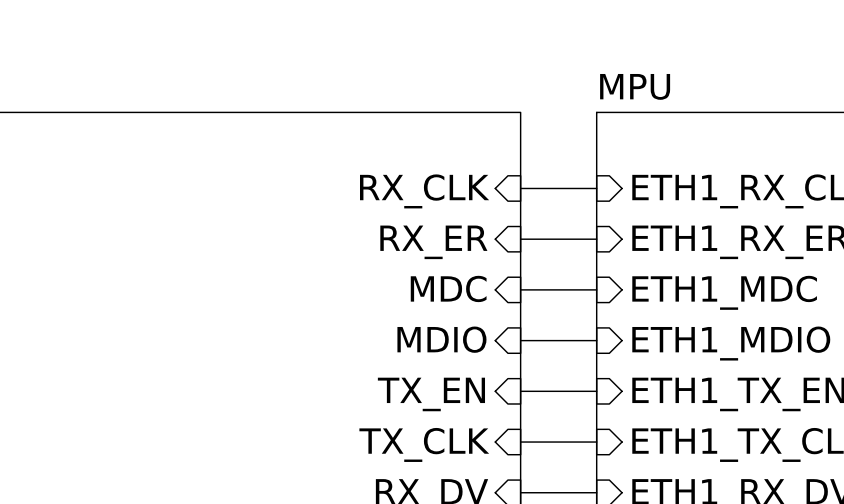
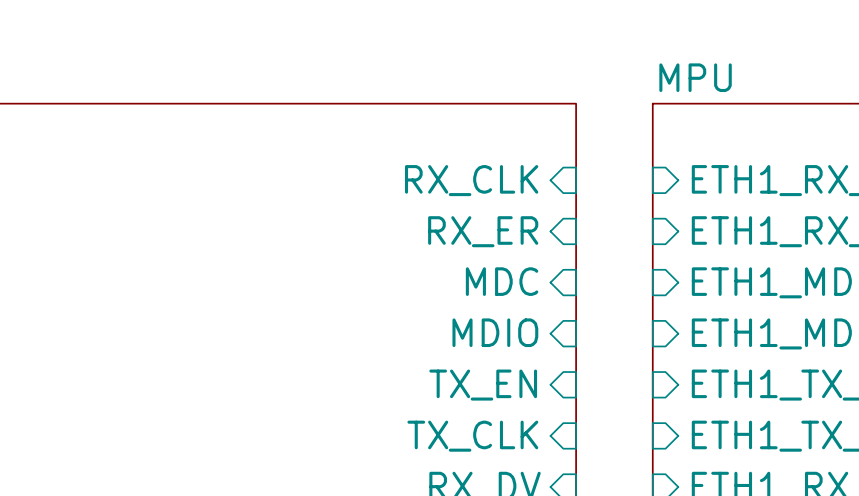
wire: (520, 188) (596, 188) -> none
wire: (520, 239) (596, 239) -> none
wire: (520, 289) (596, 289) -> none
wire: (520, 340) (596, 340) -> none
wire: (520, 391) (596, 391) -> none
wire: (520, 442) (596, 442) -> none
wire: (520, 492) (596, 492) -> none

